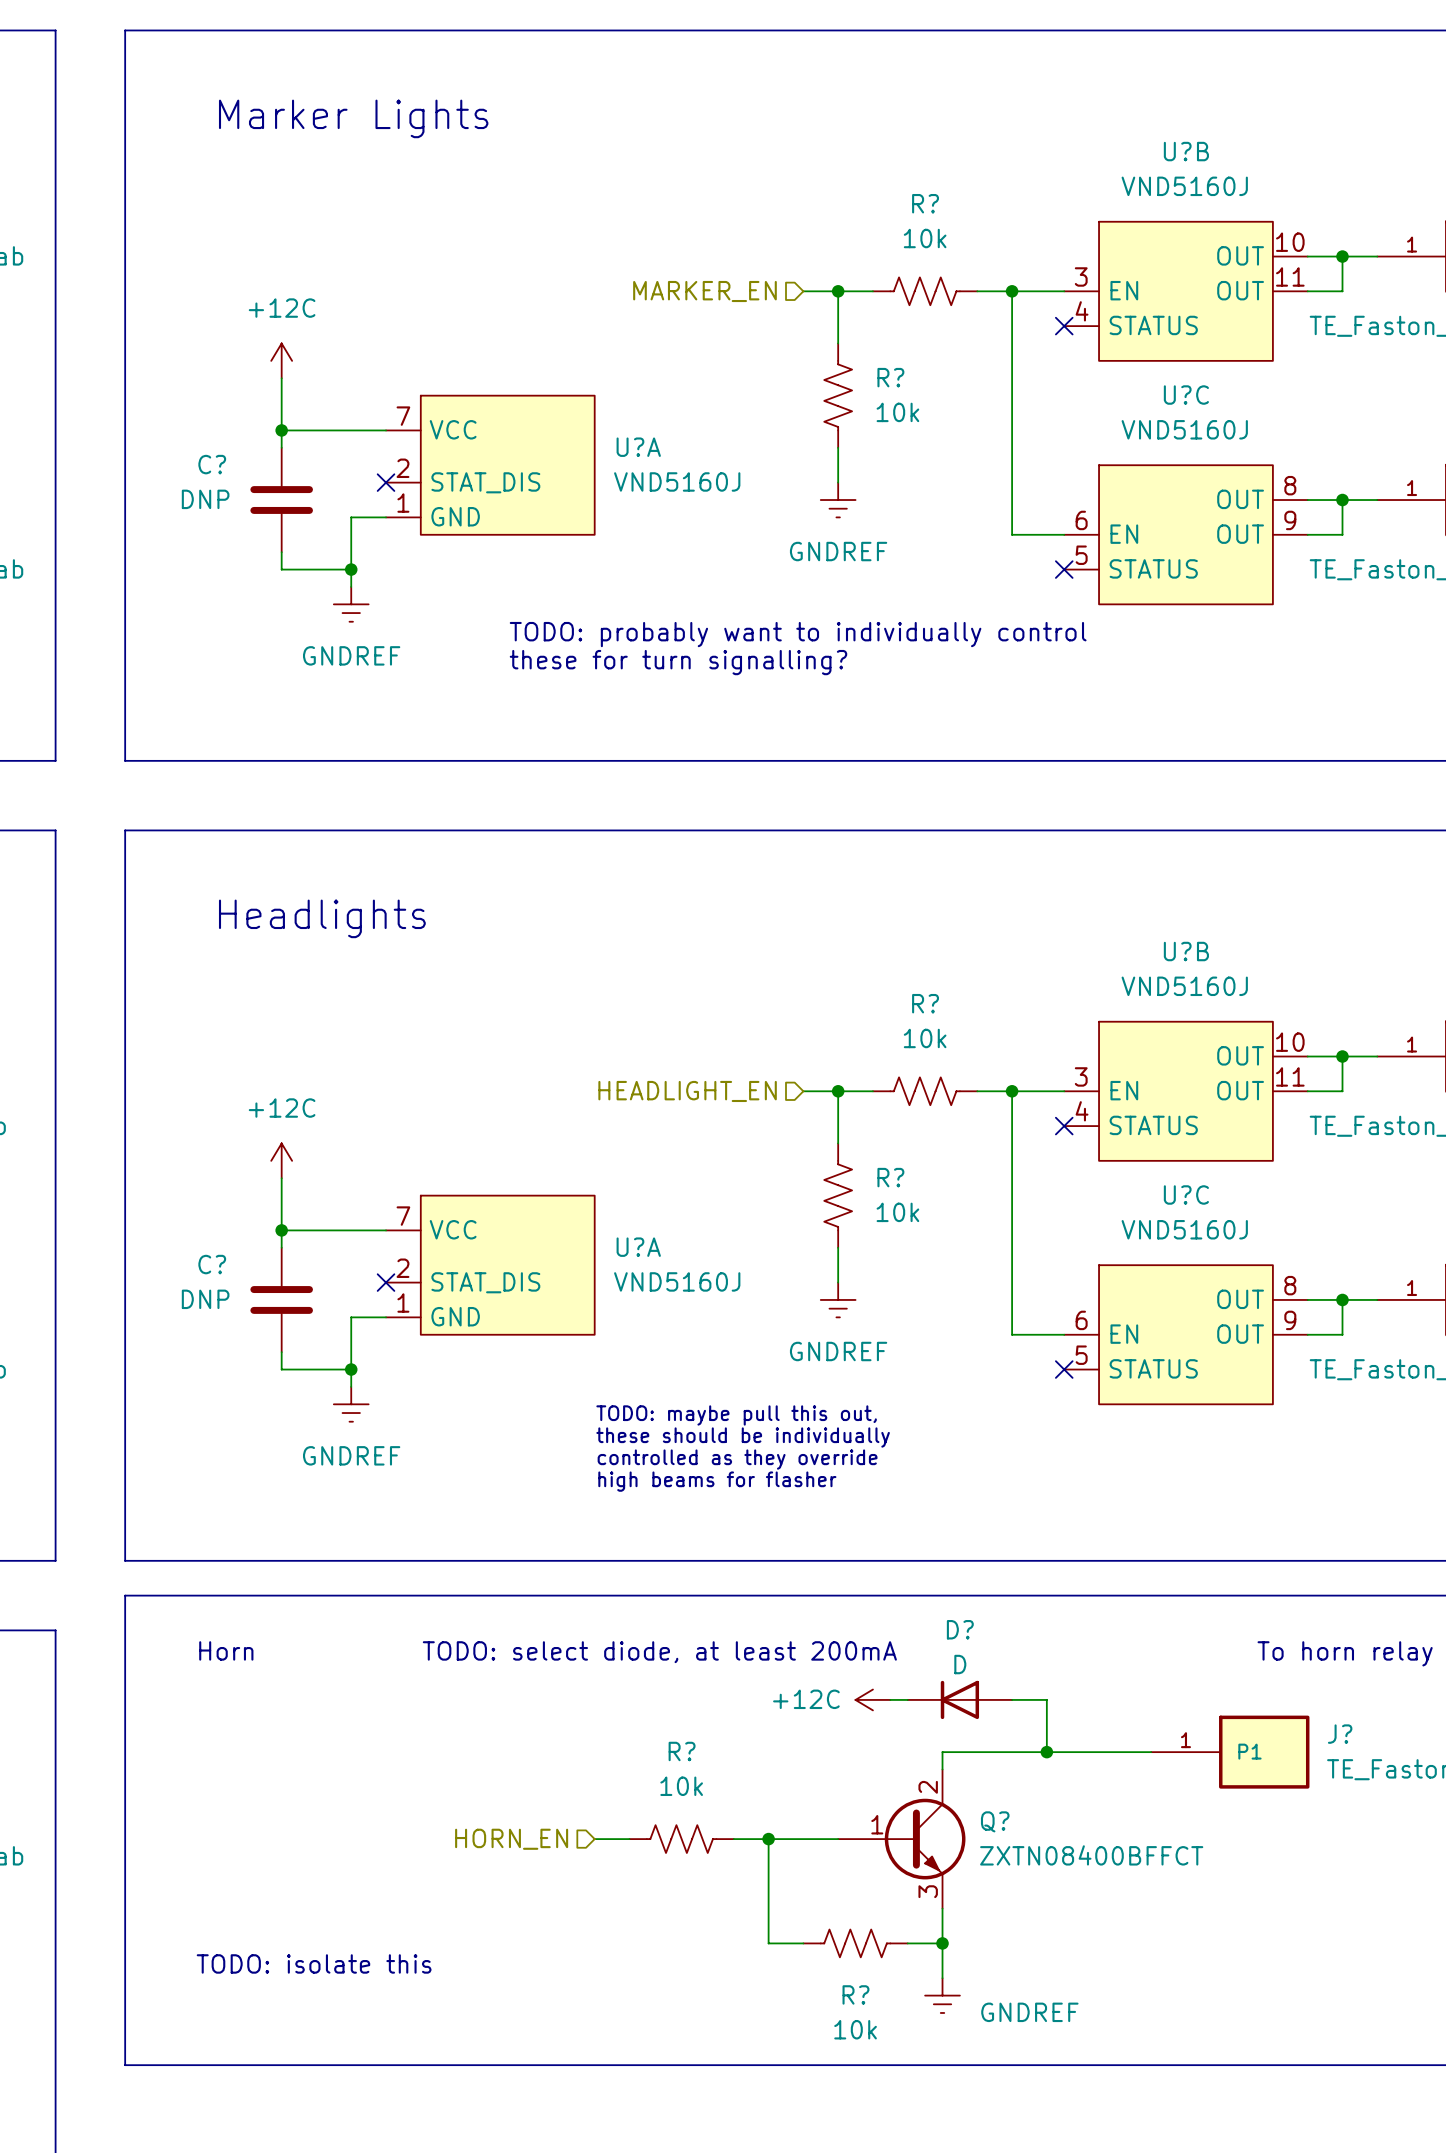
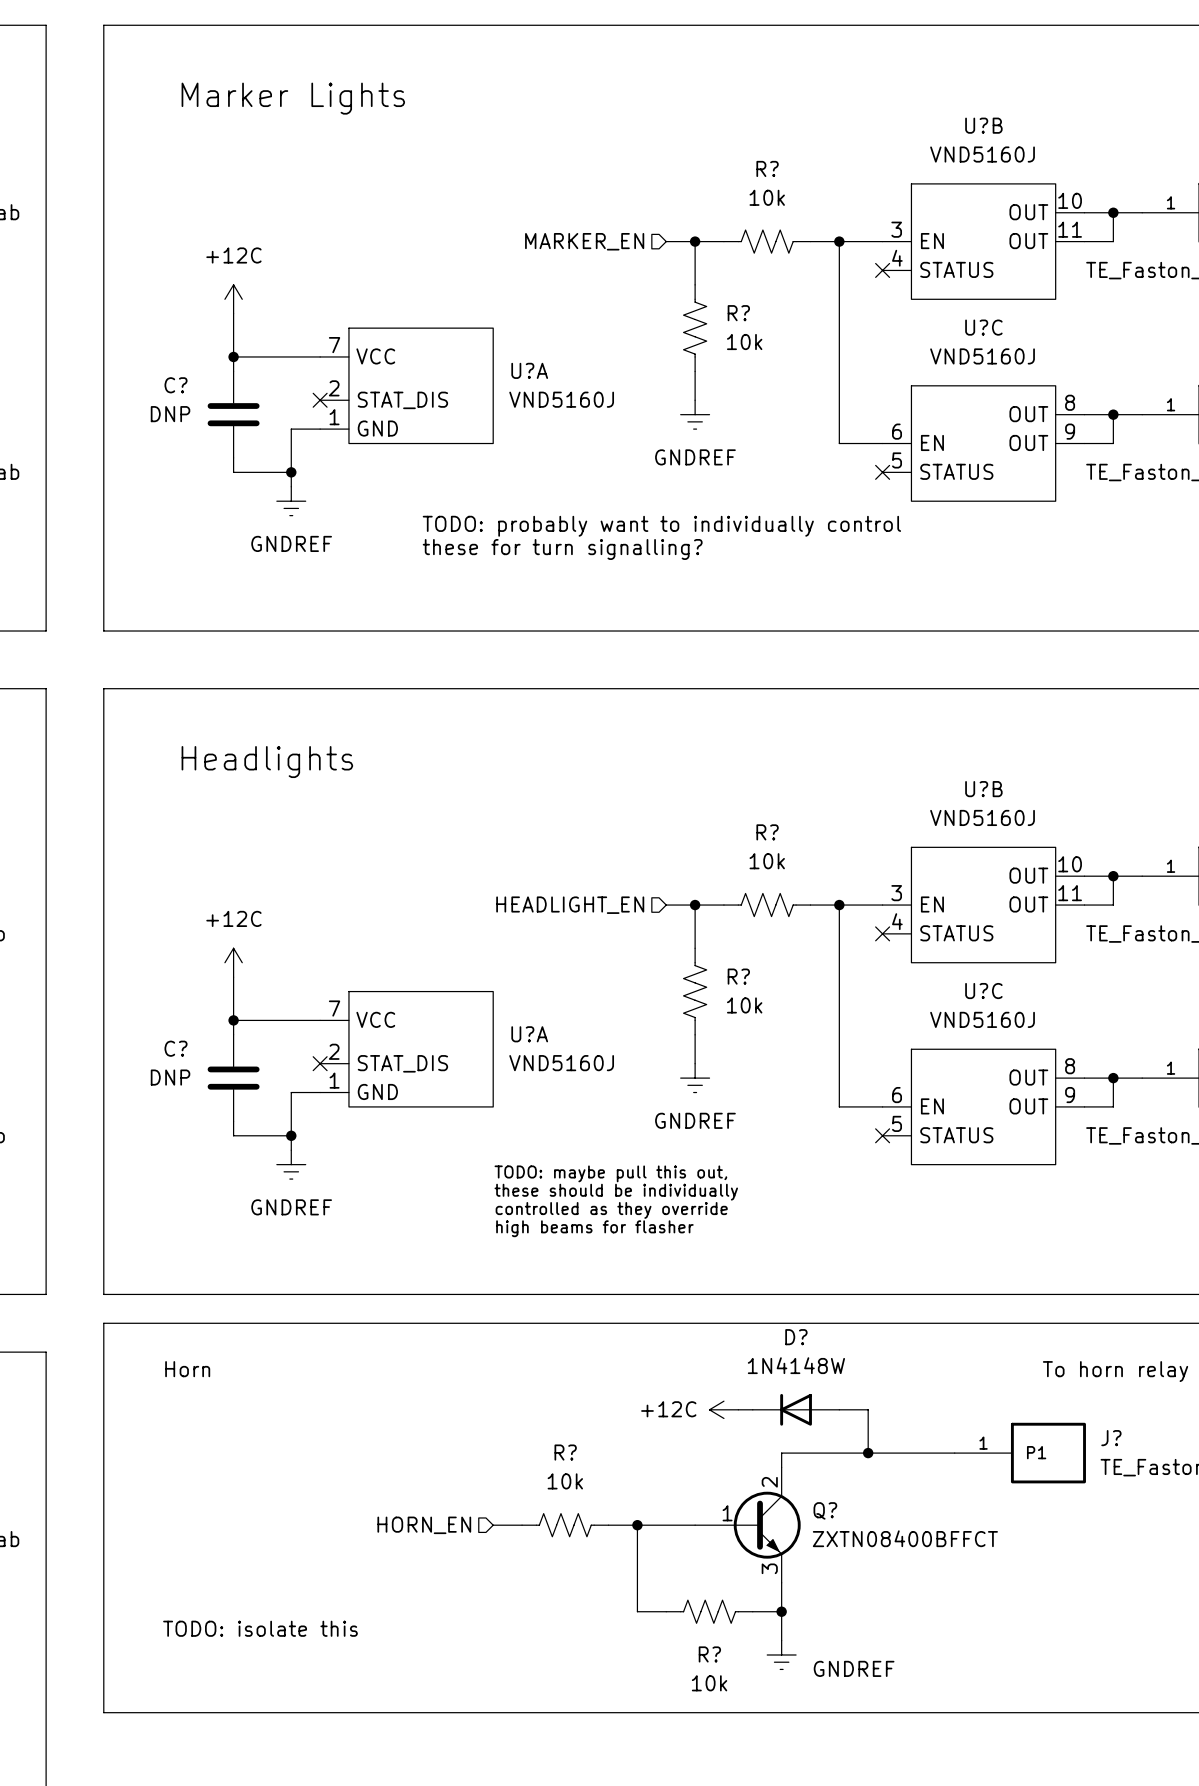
D? name position: D? (960, 1629) -> D? (796, 1337)
text: TODO: select diode, at least 200mA (659, 1652) -> none
D? value: D (960, 1664) -> 1N4148W (796, 1365)

